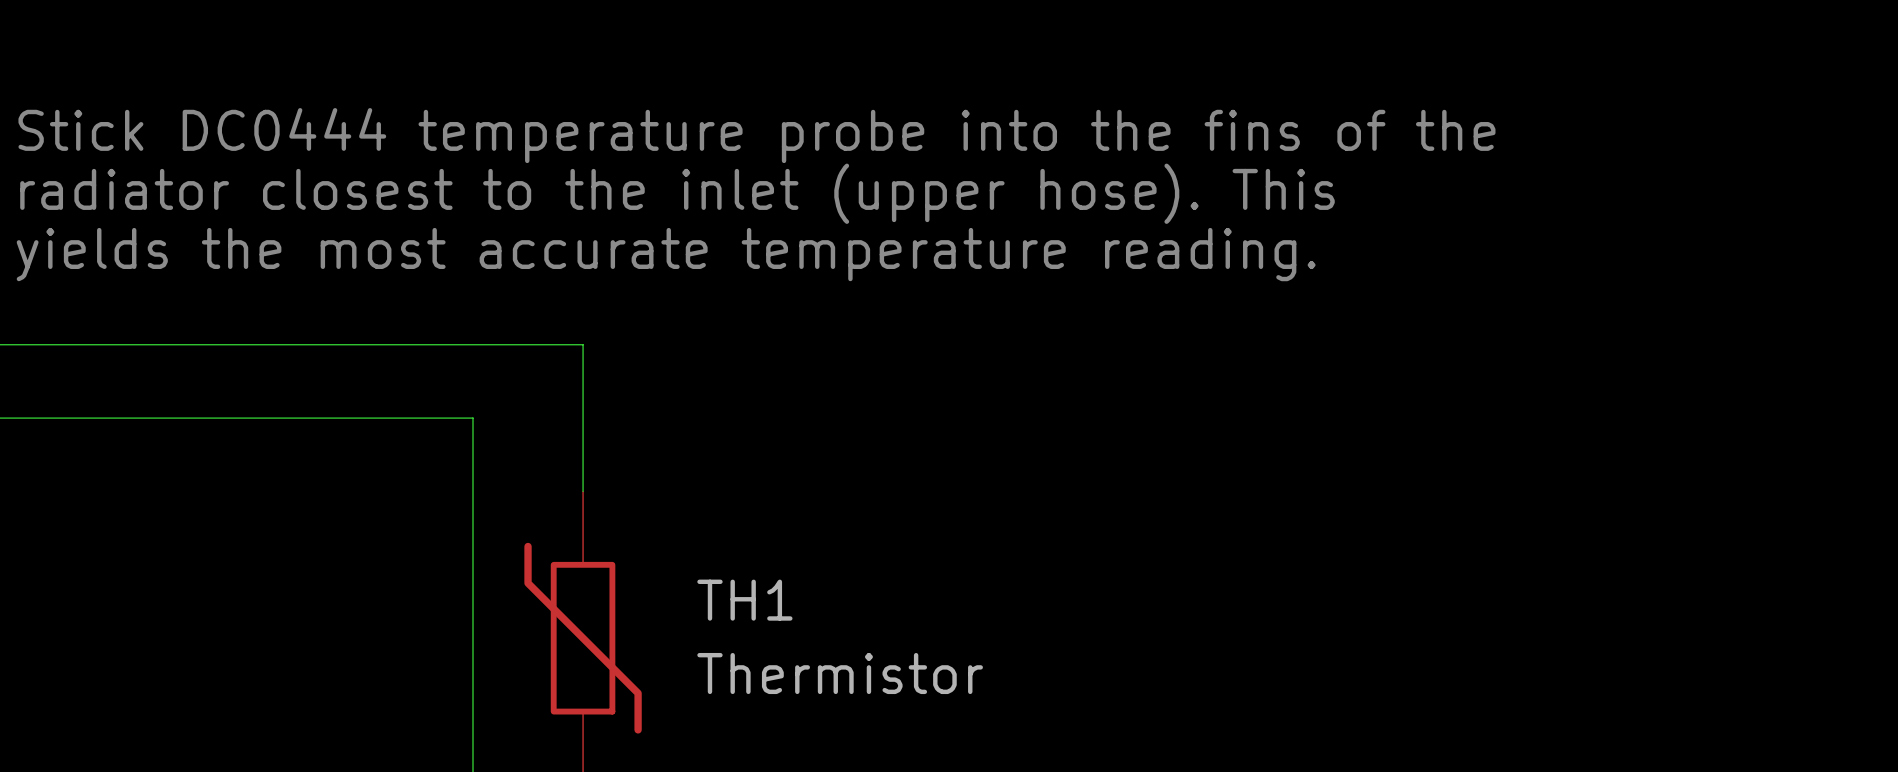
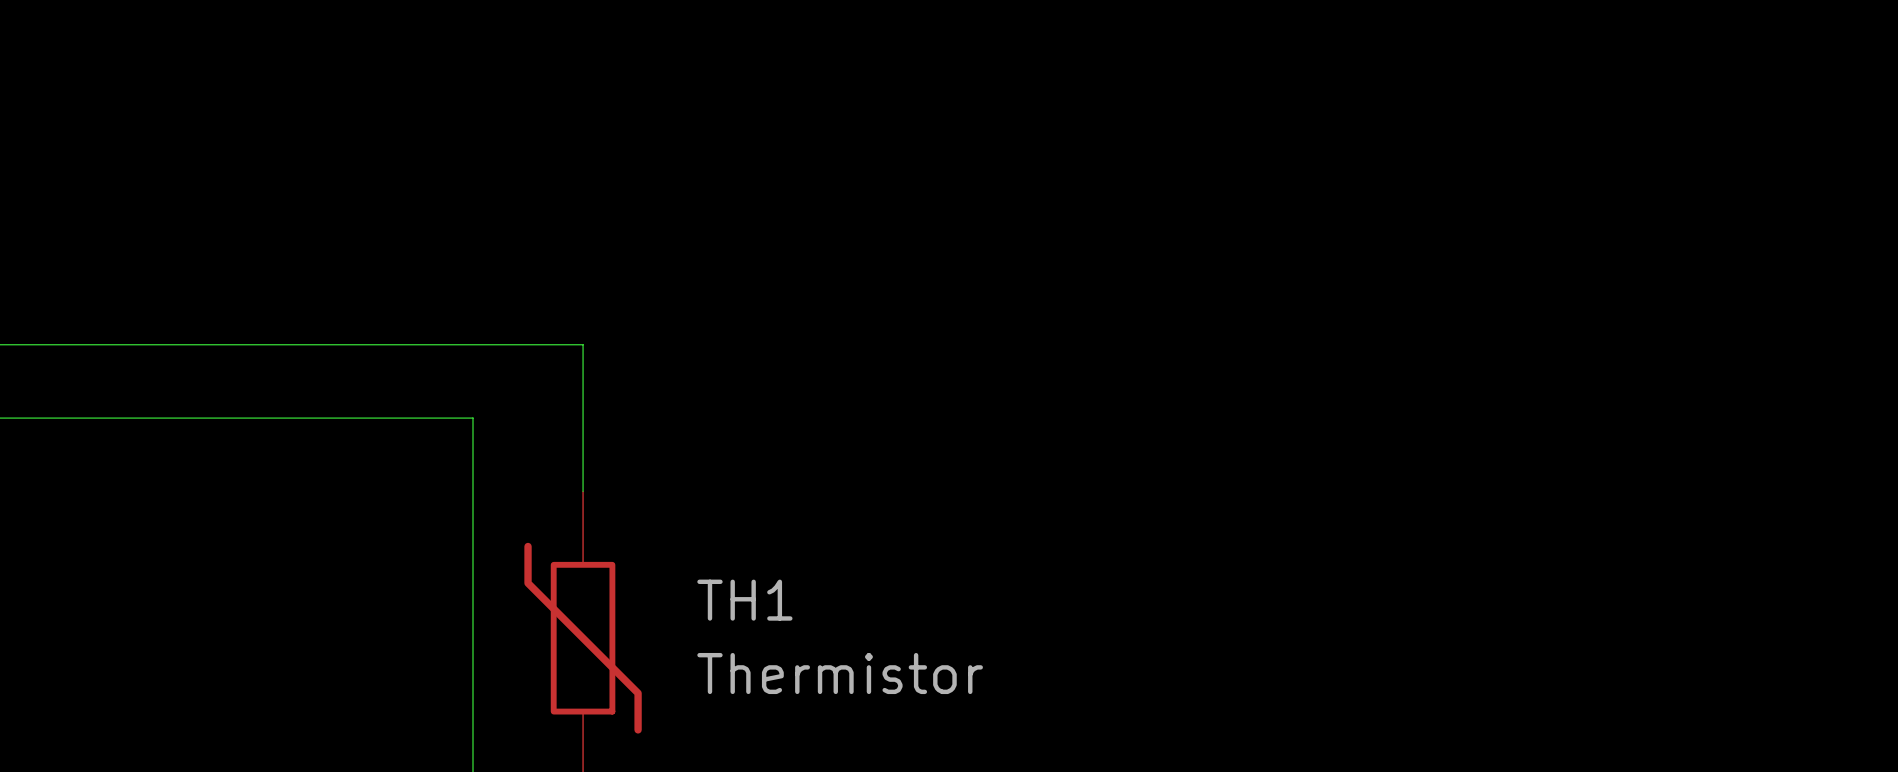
text: Stick DC0444 temperature probe into the fins of the (756, 135) -> none
text: radiator closest to the inlet (upper hose). This (677, 193) -> none
text: yields the most accurate temperature reading. (666, 254) -> none

